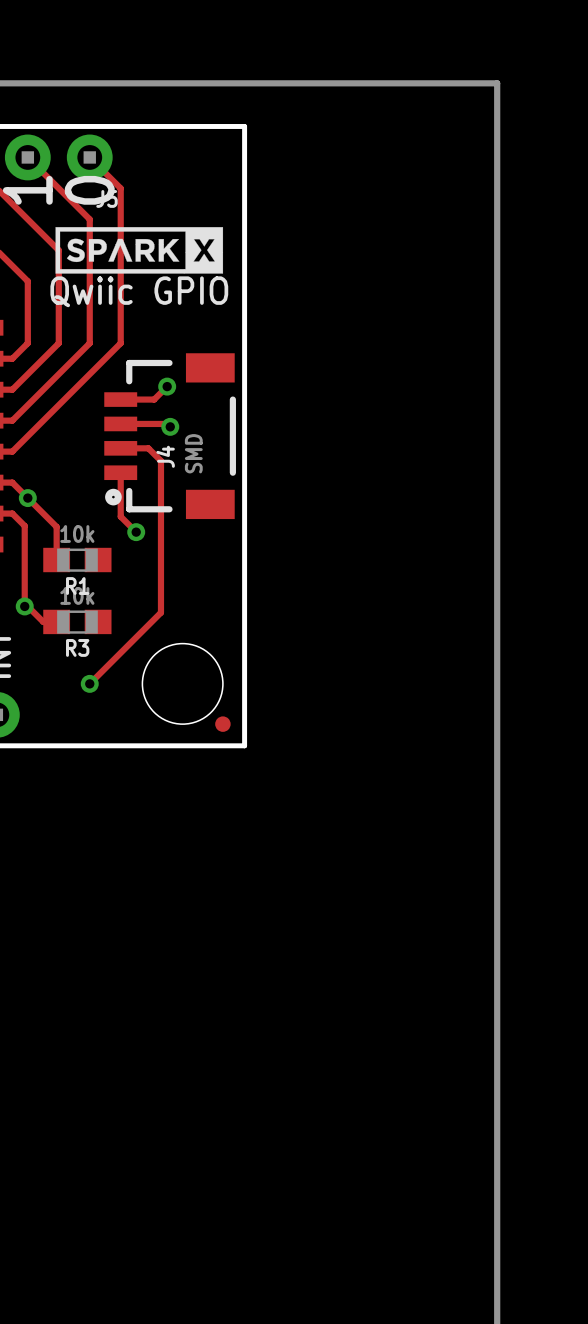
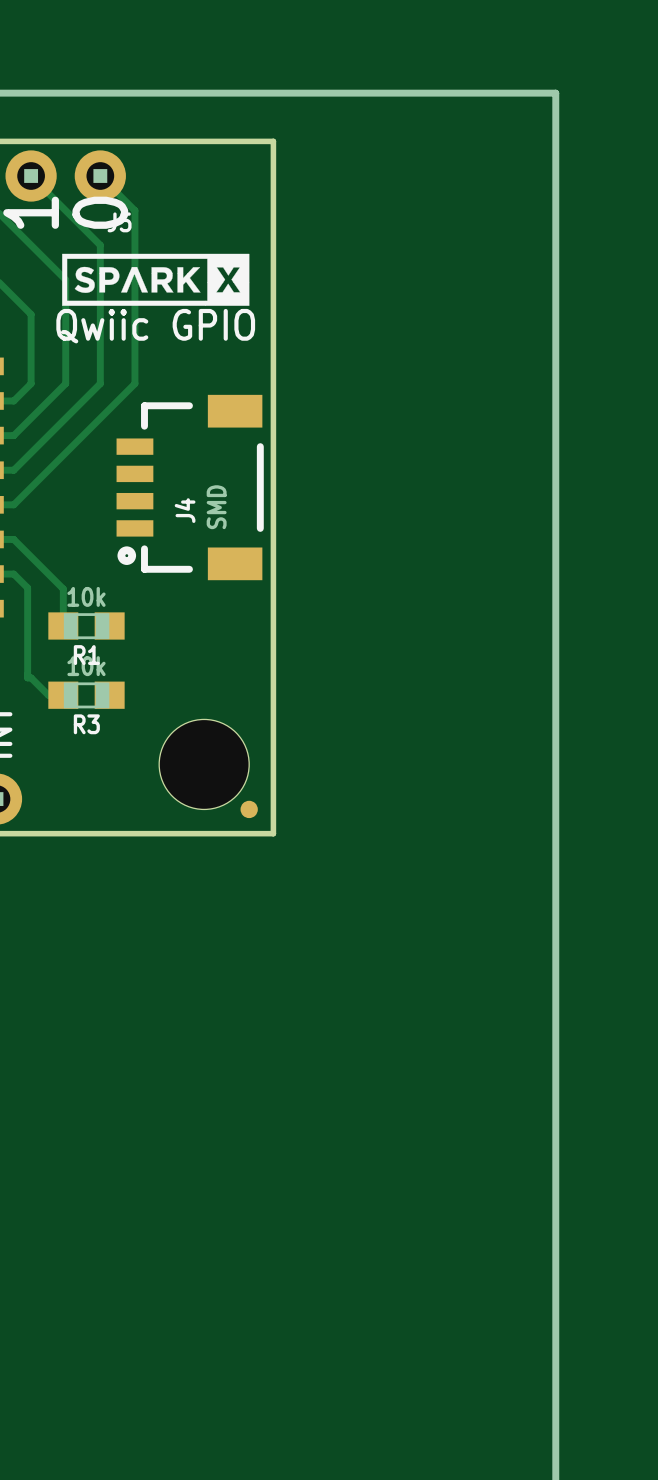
track: (167, 386) (154, 399) (120, 399) -> none
via: (167, 386) -> none
track: (120, 423) (167, 423) (170, 426) -> none
via: (170, 426) -> none
track: (120, 448) (148, 448) (160, 460) (160, 612) (89, 683) -> none
track: (120, 472) (120, 516) (136, 532) -> none
via: (27, 498) -> none
via: (136, 532) -> none
via: (24, 606) -> none
via: (89, 683) -> none

